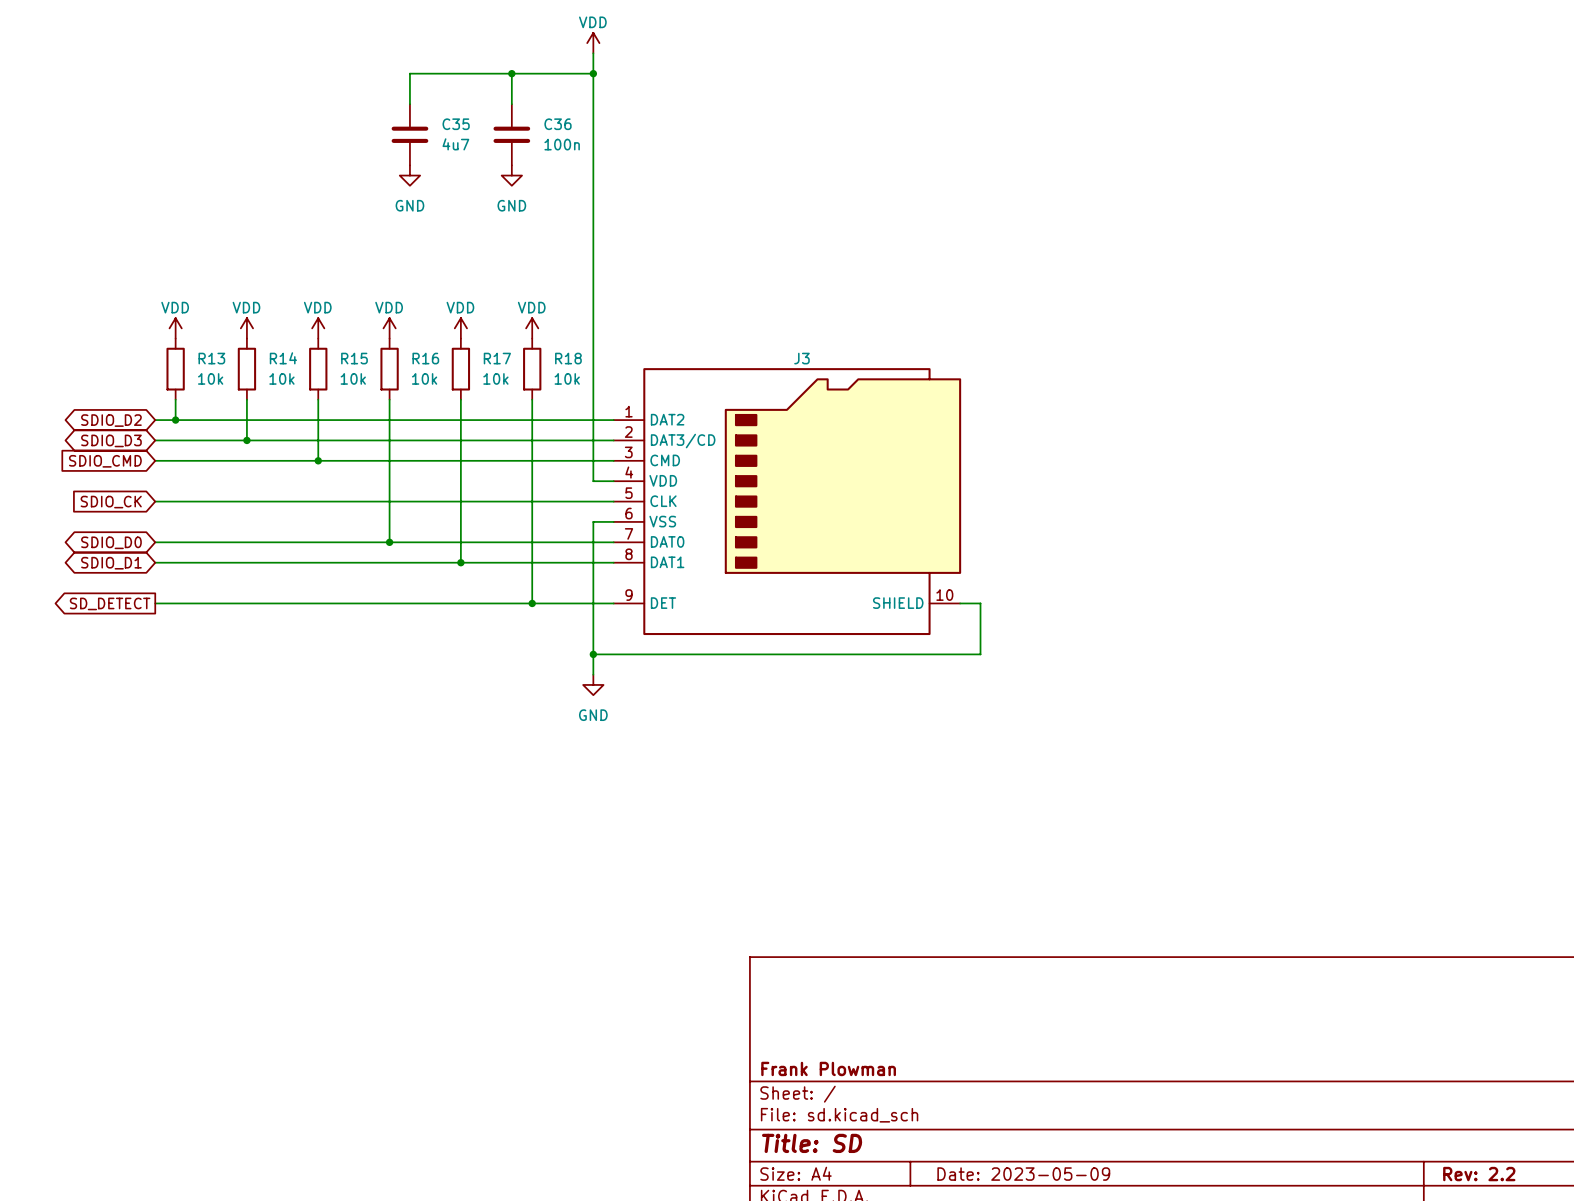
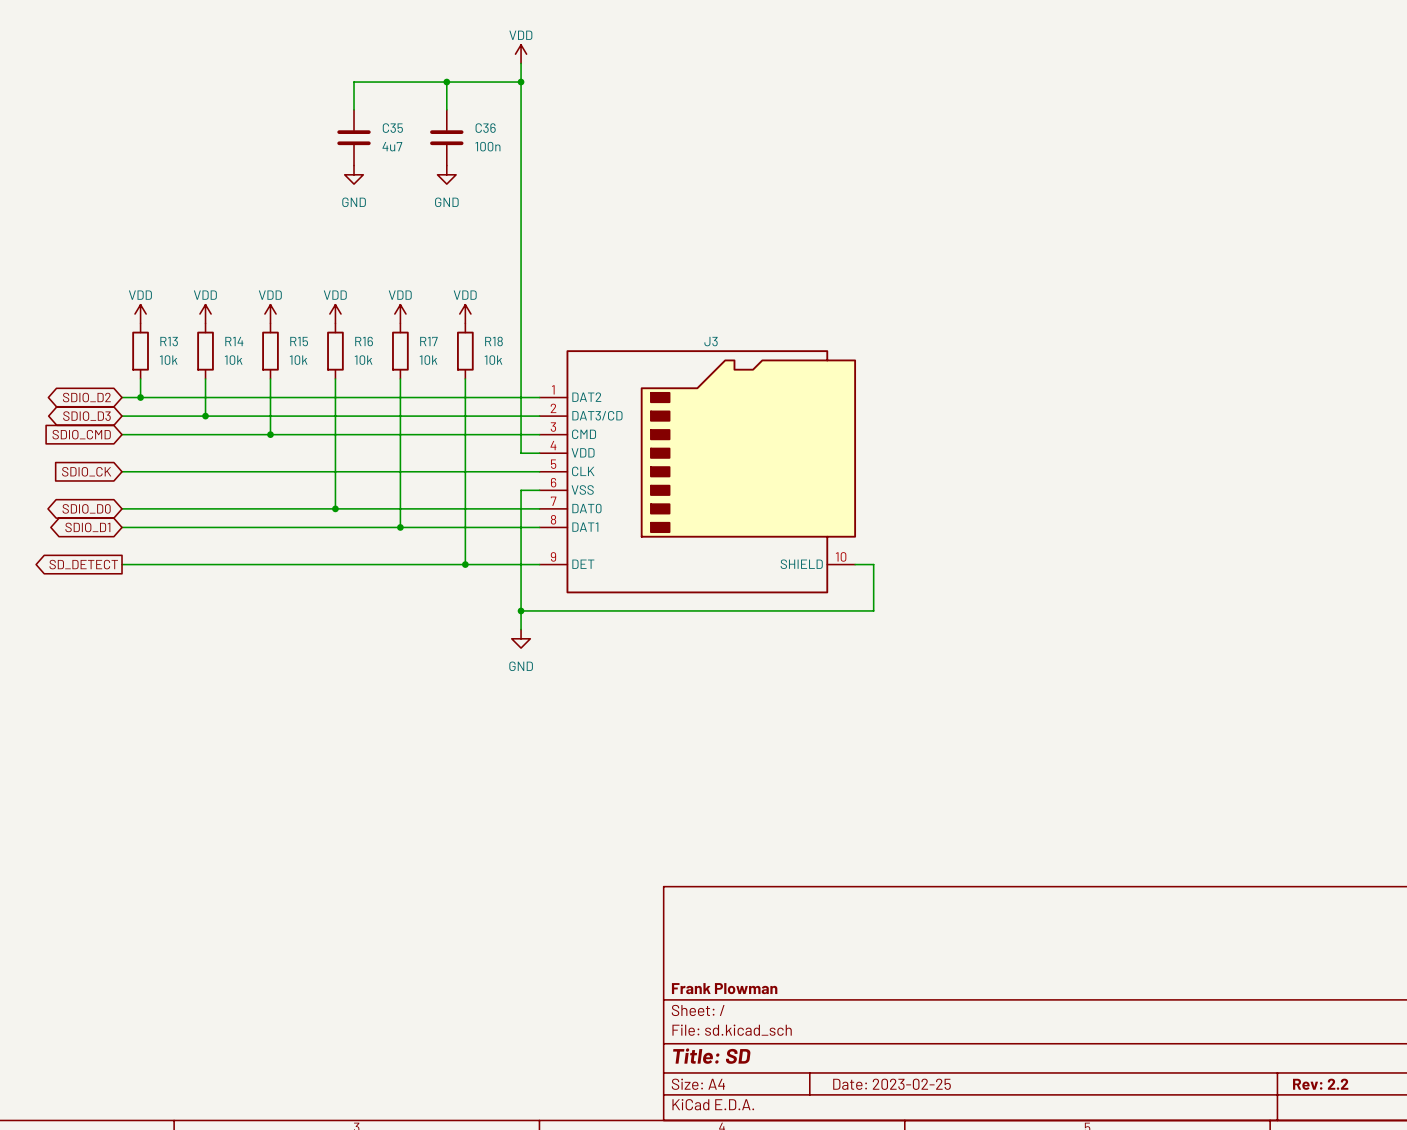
title block: Date: 2023-05-09 (1023, 1174) -> Date: 2023-02-25 (892, 1084)

